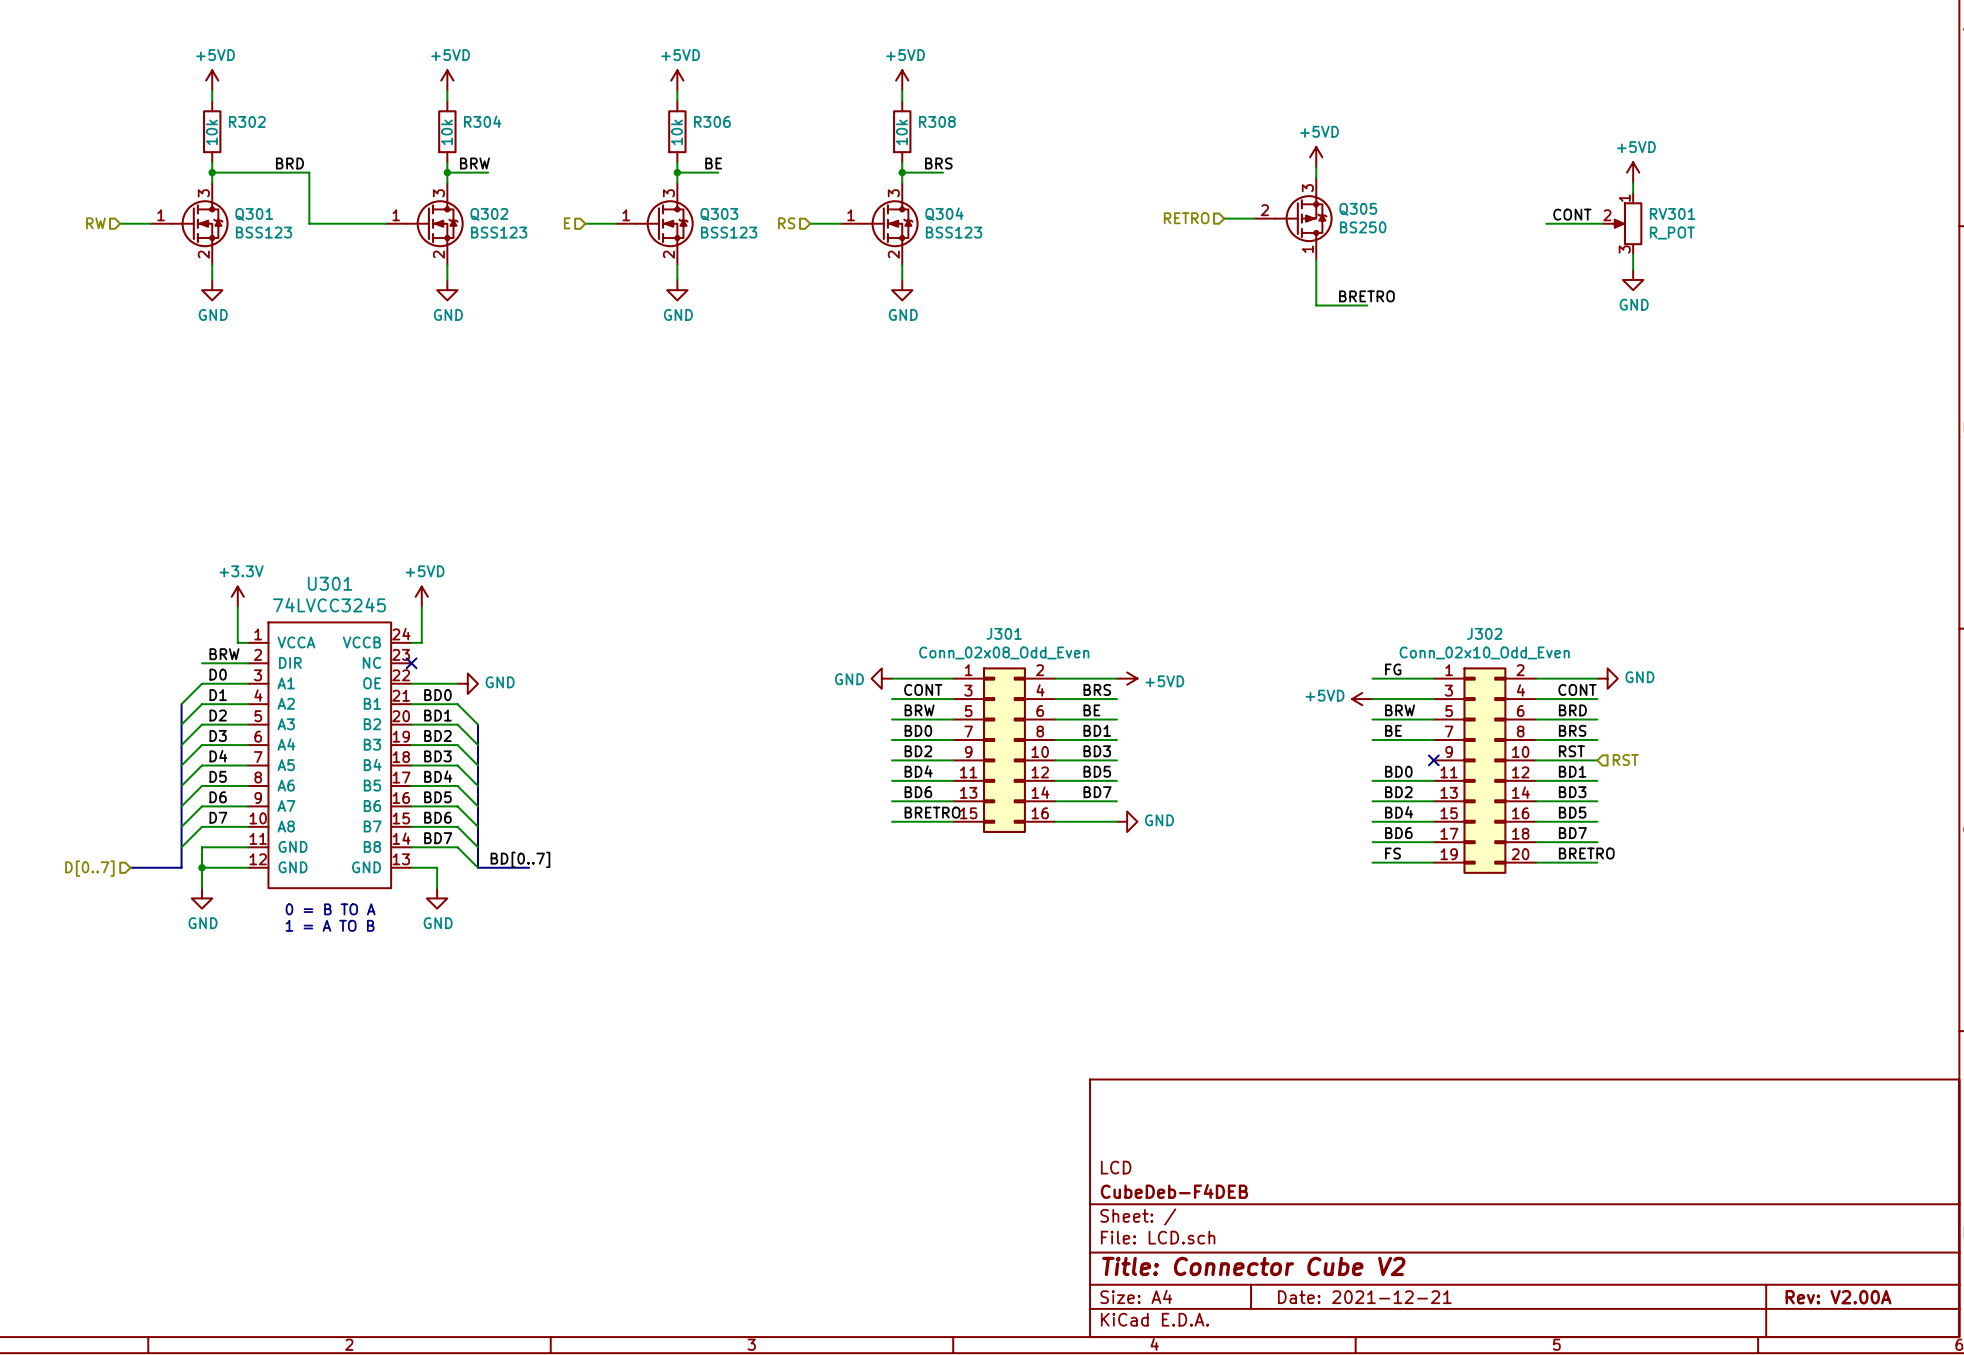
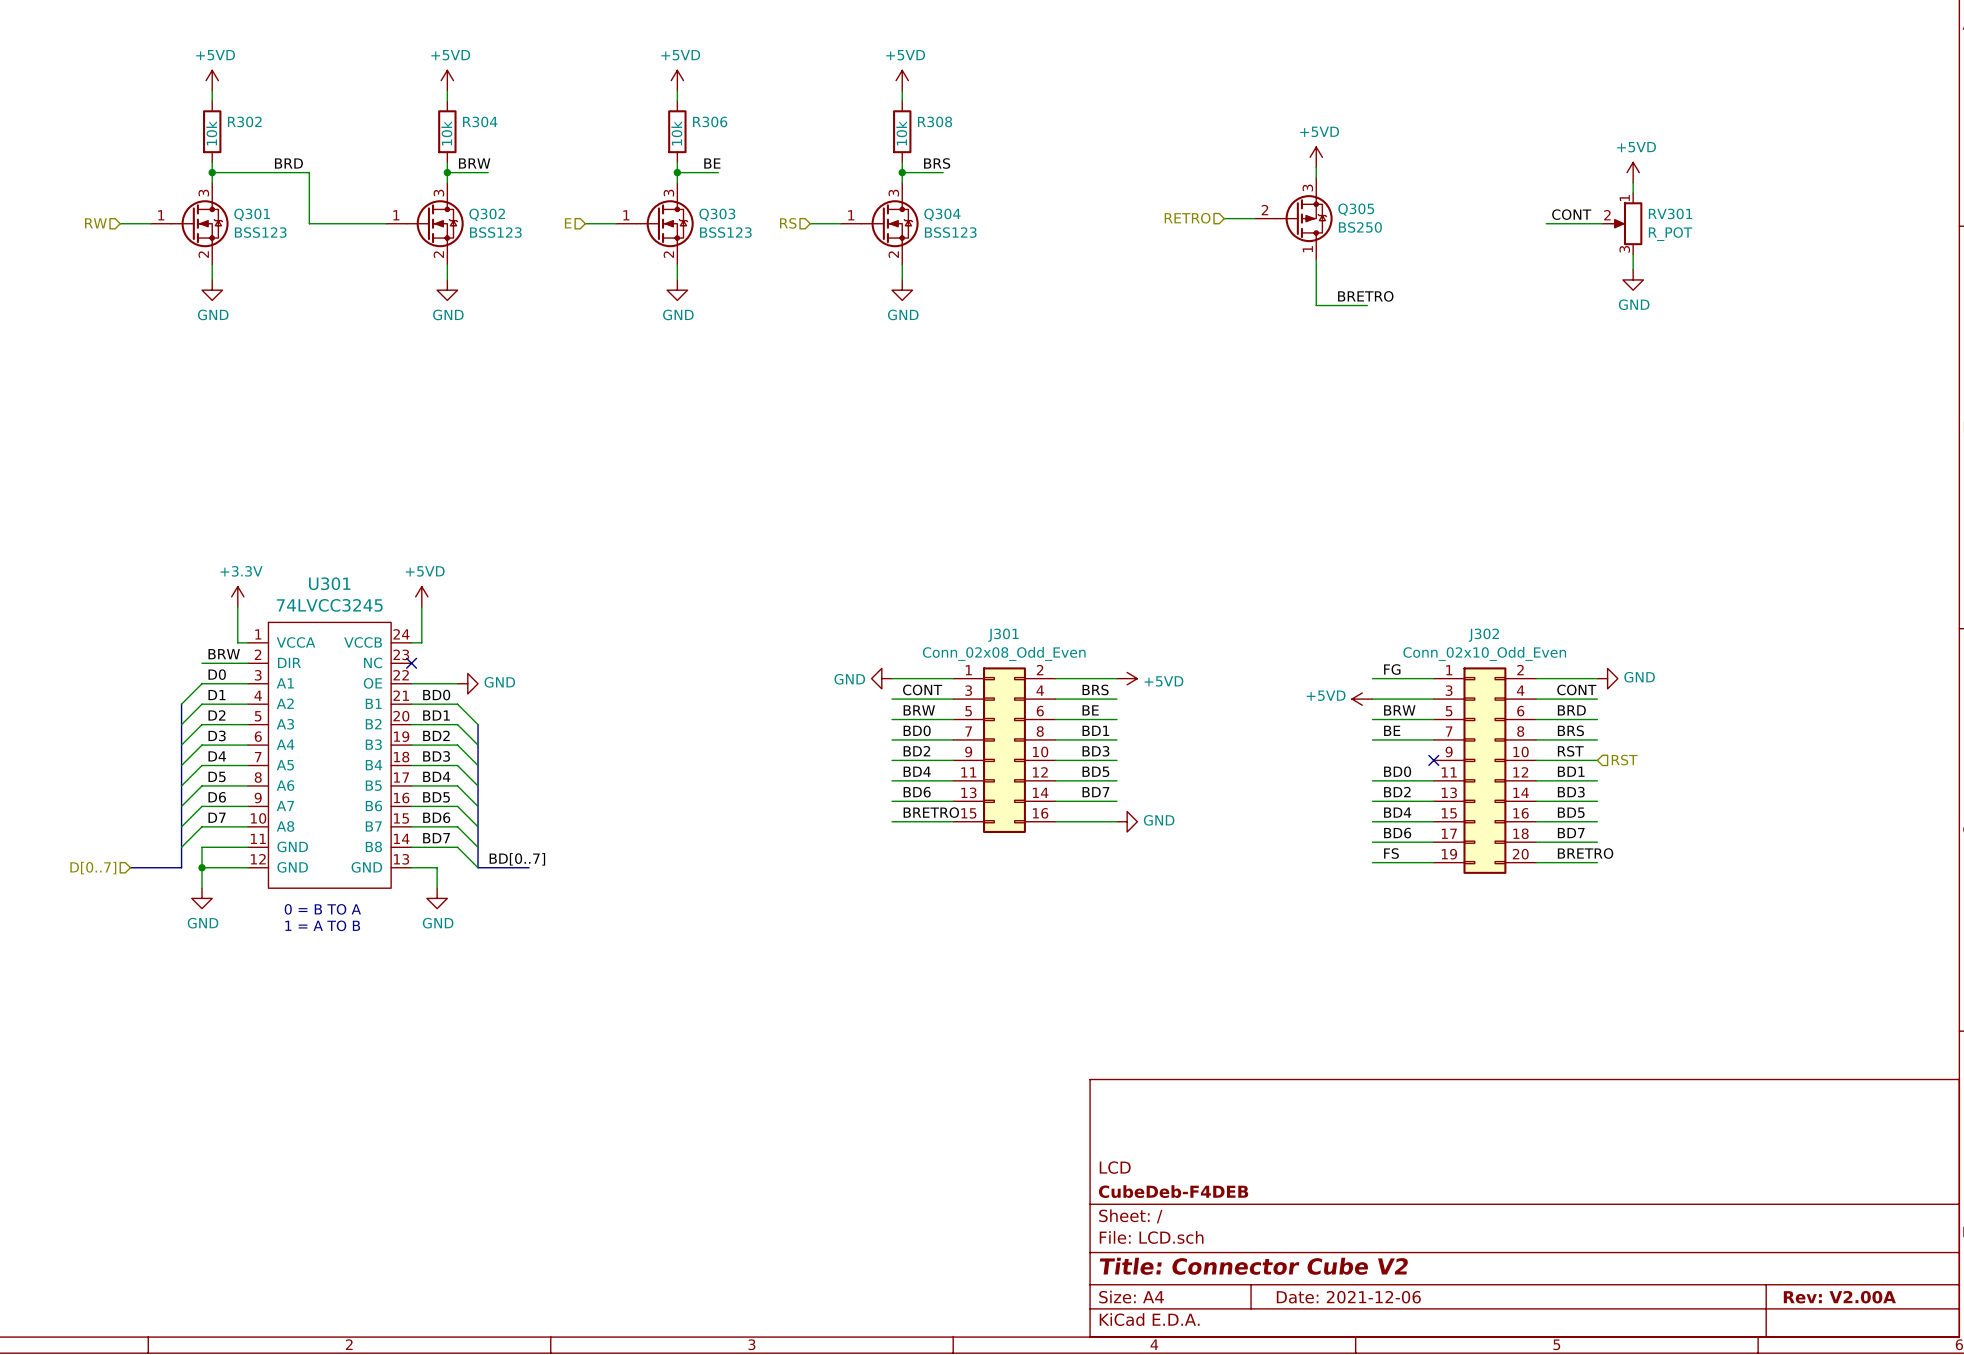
title block: Date: 2021-12-21 (1364, 1297) -> Date: 2021-12-06 (1348, 1297)

